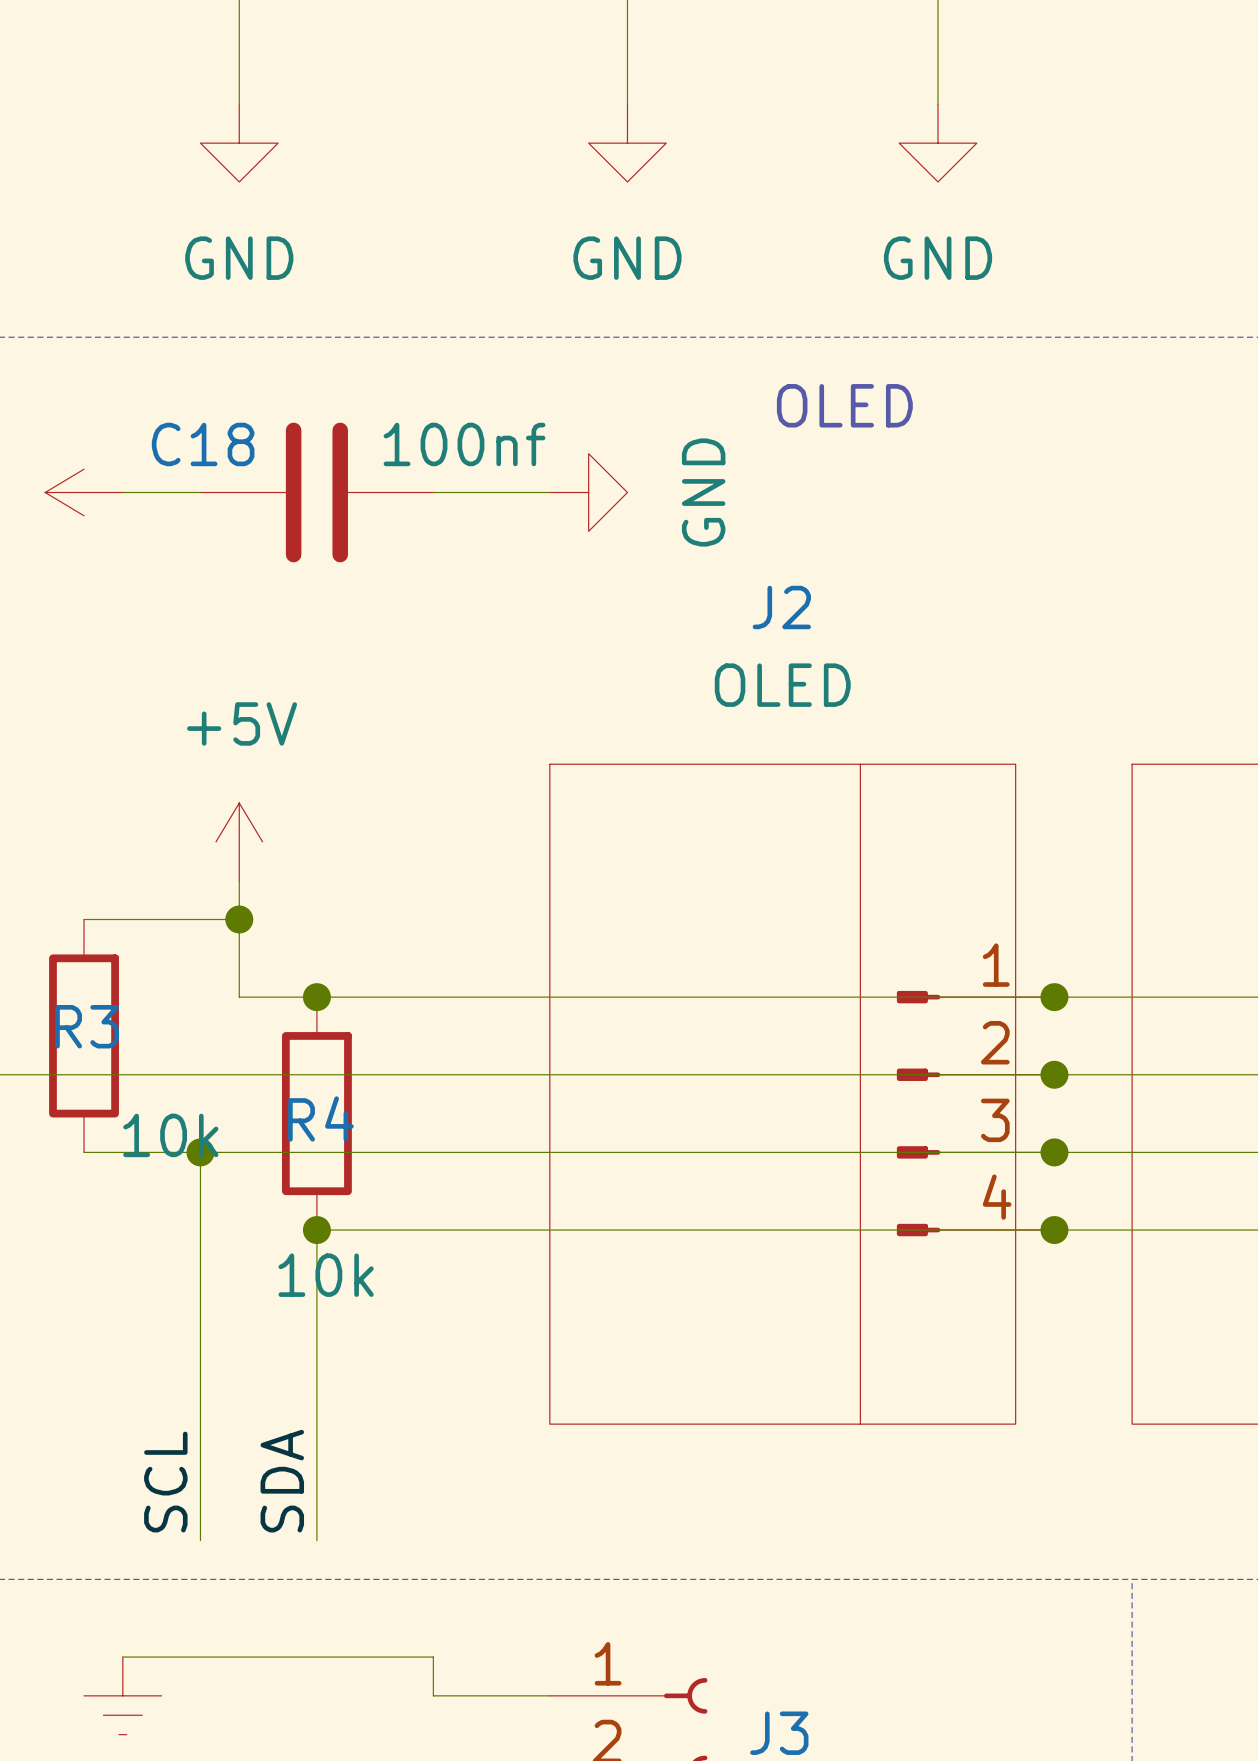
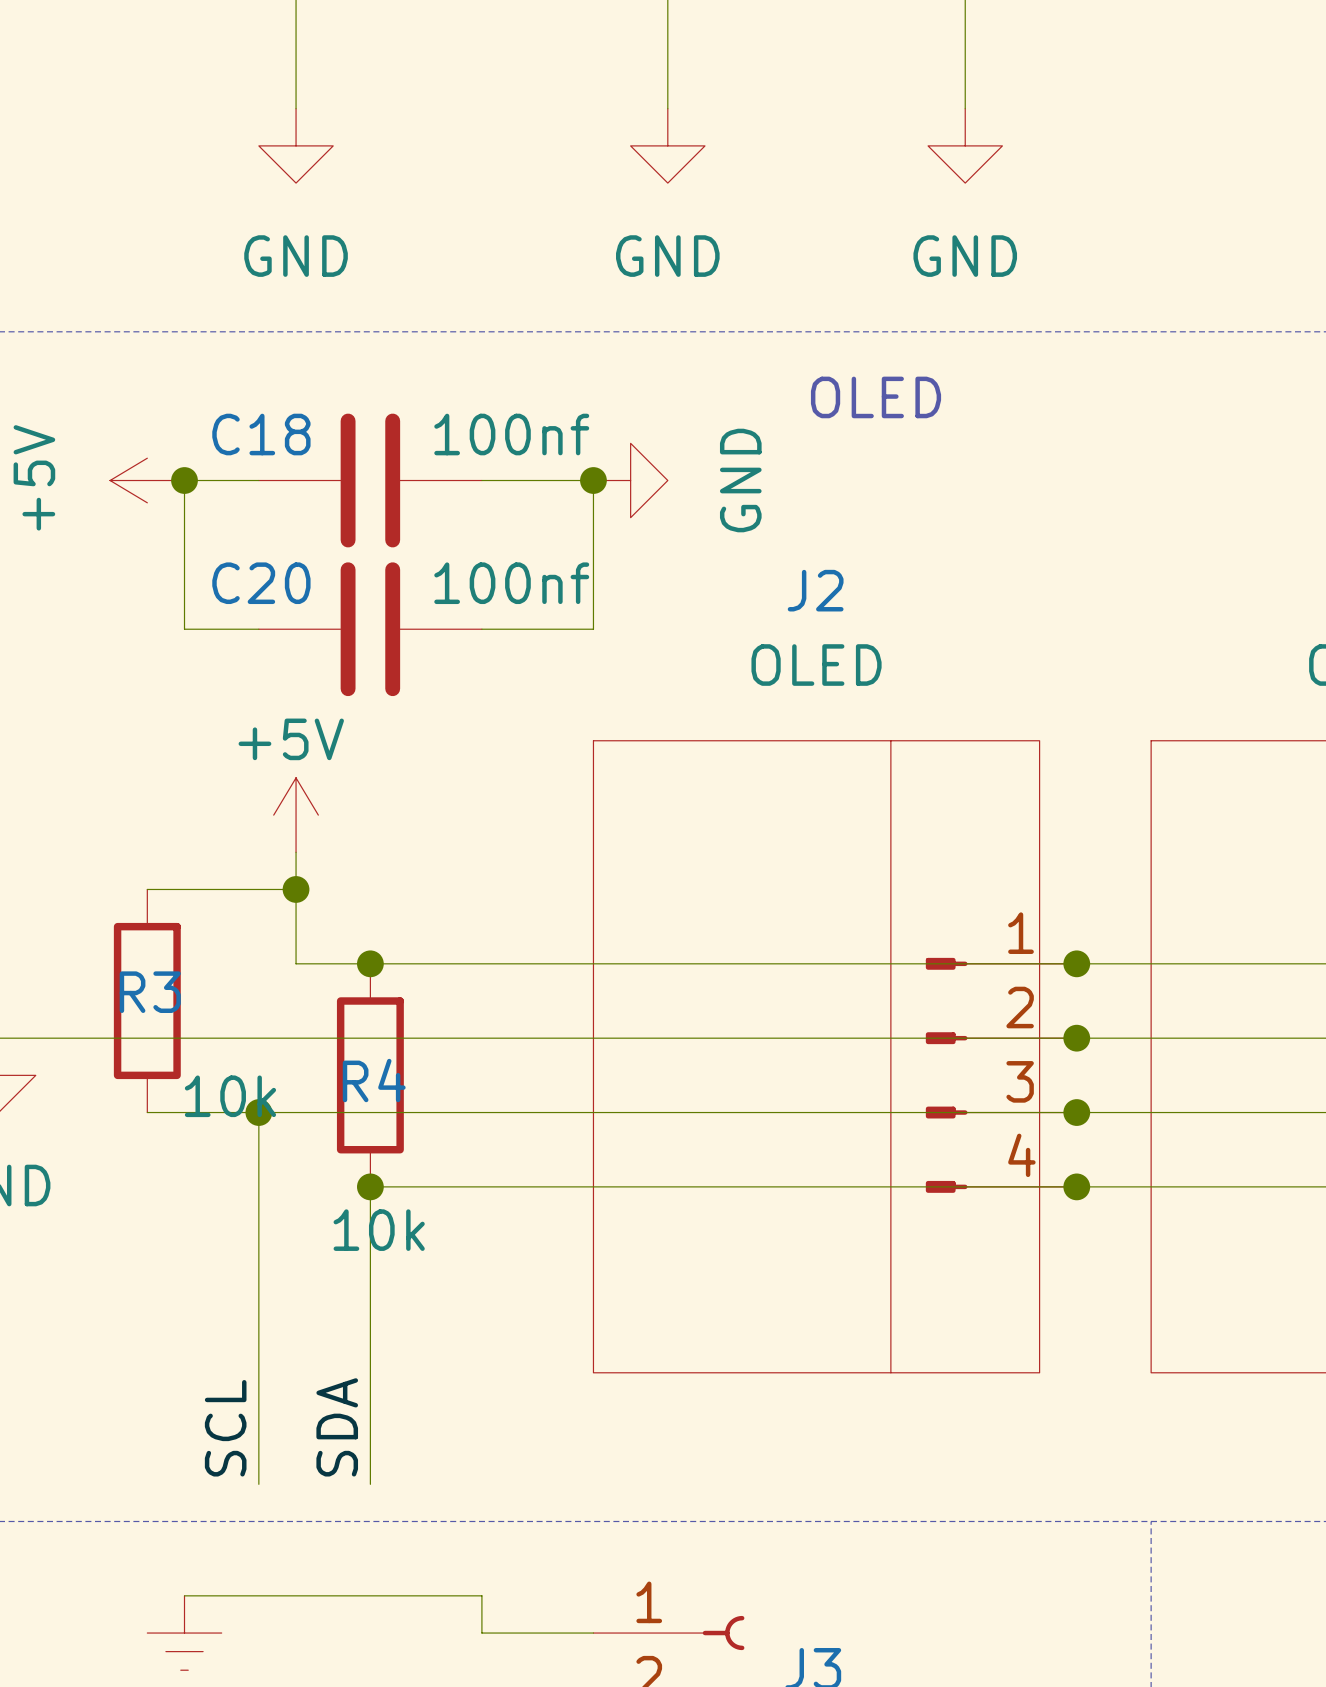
wire: none -> (184, 480) (184, 629) (258, 629)
junction: none -> (184, 480)
wire: none -> (593, 480) (593, 629) (481, 629)
junction: none -> (593, 480)
C20: none -> 100nf (370, 629)
power symbol text position: +5V (242, 723) -> +5V (291, 739)

